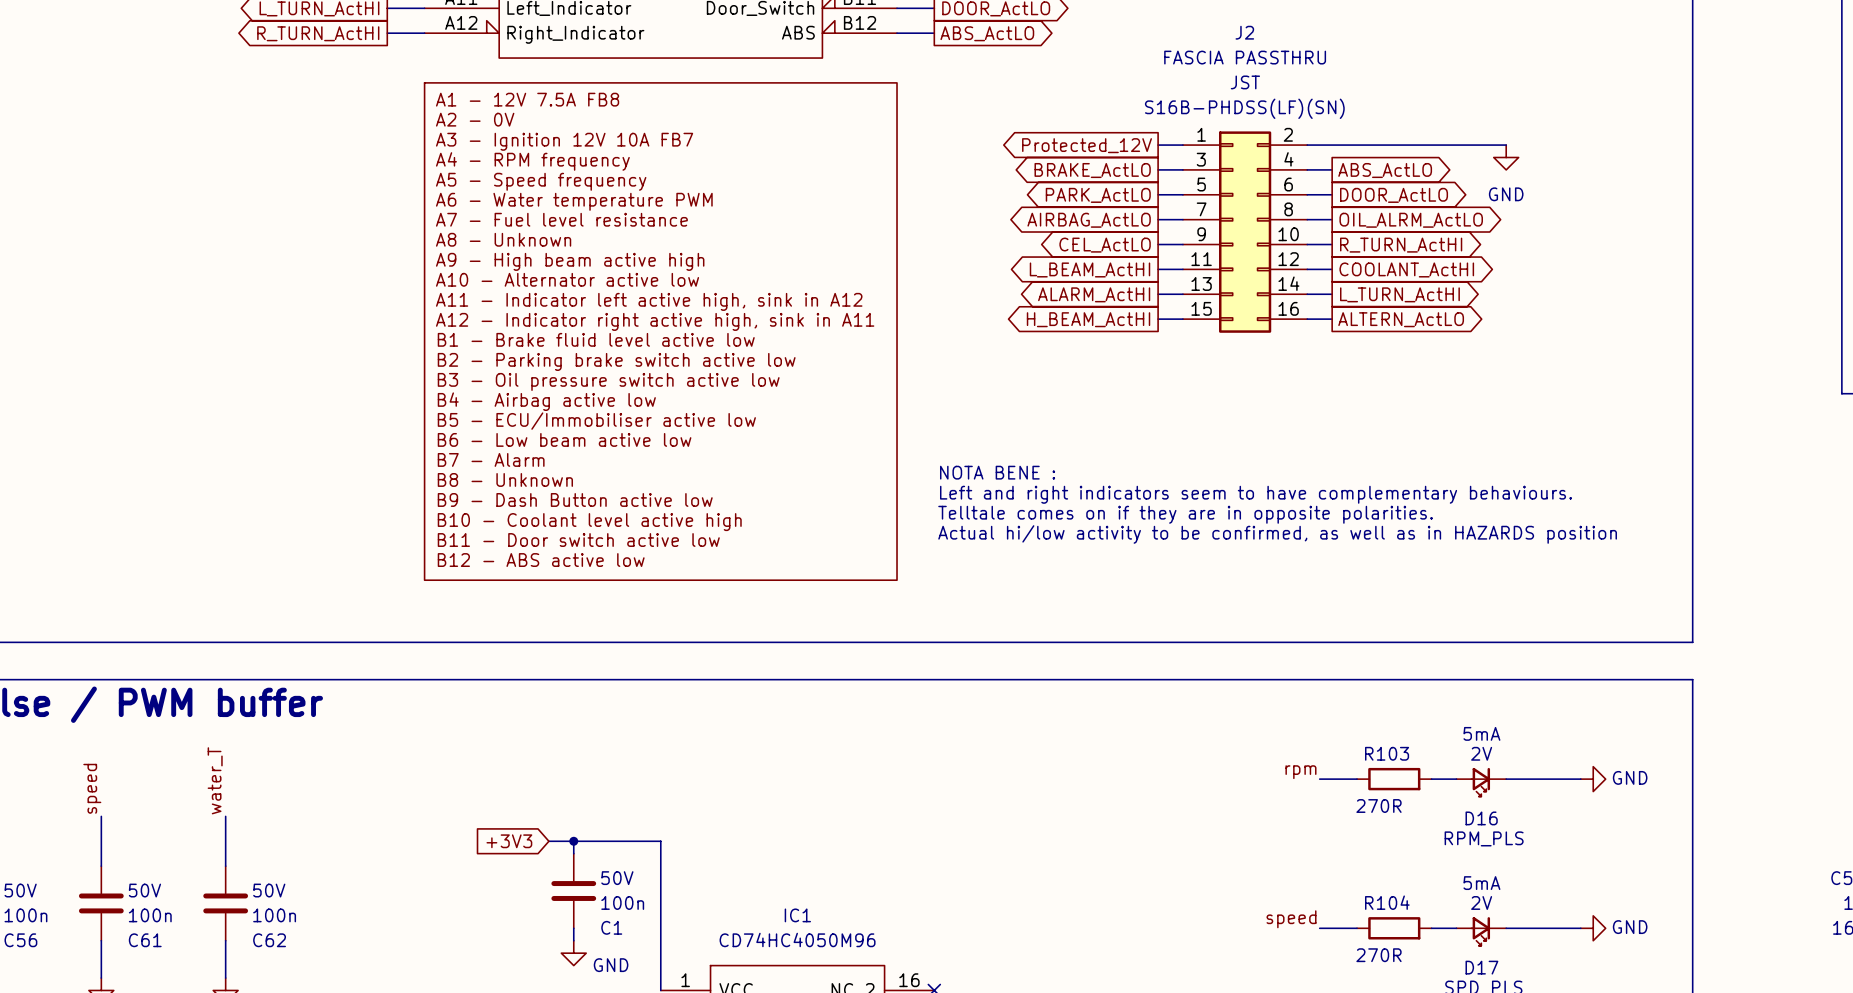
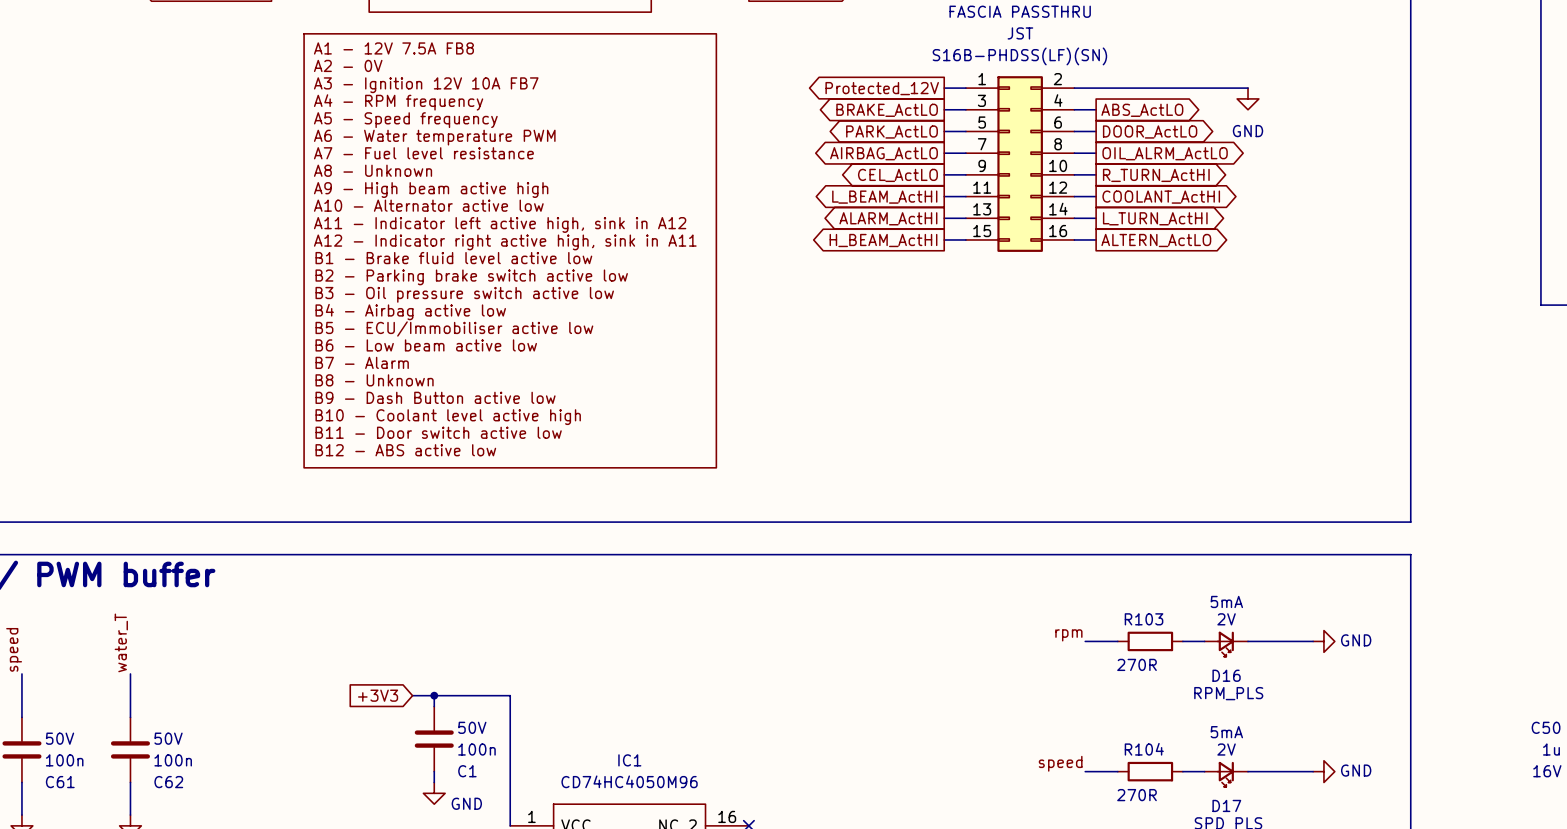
text: NOTA BENE : (997, 472) -> none
text: Left and right indicators seem to have complementary behaviours. (1255, 494) -> none
text: Telltale comes on if they are in opposite polarities. (1185, 514) -> none
text: Actual hi/low activity to be confirmed, as well as in HAZARDS position (1277, 534) -> none

